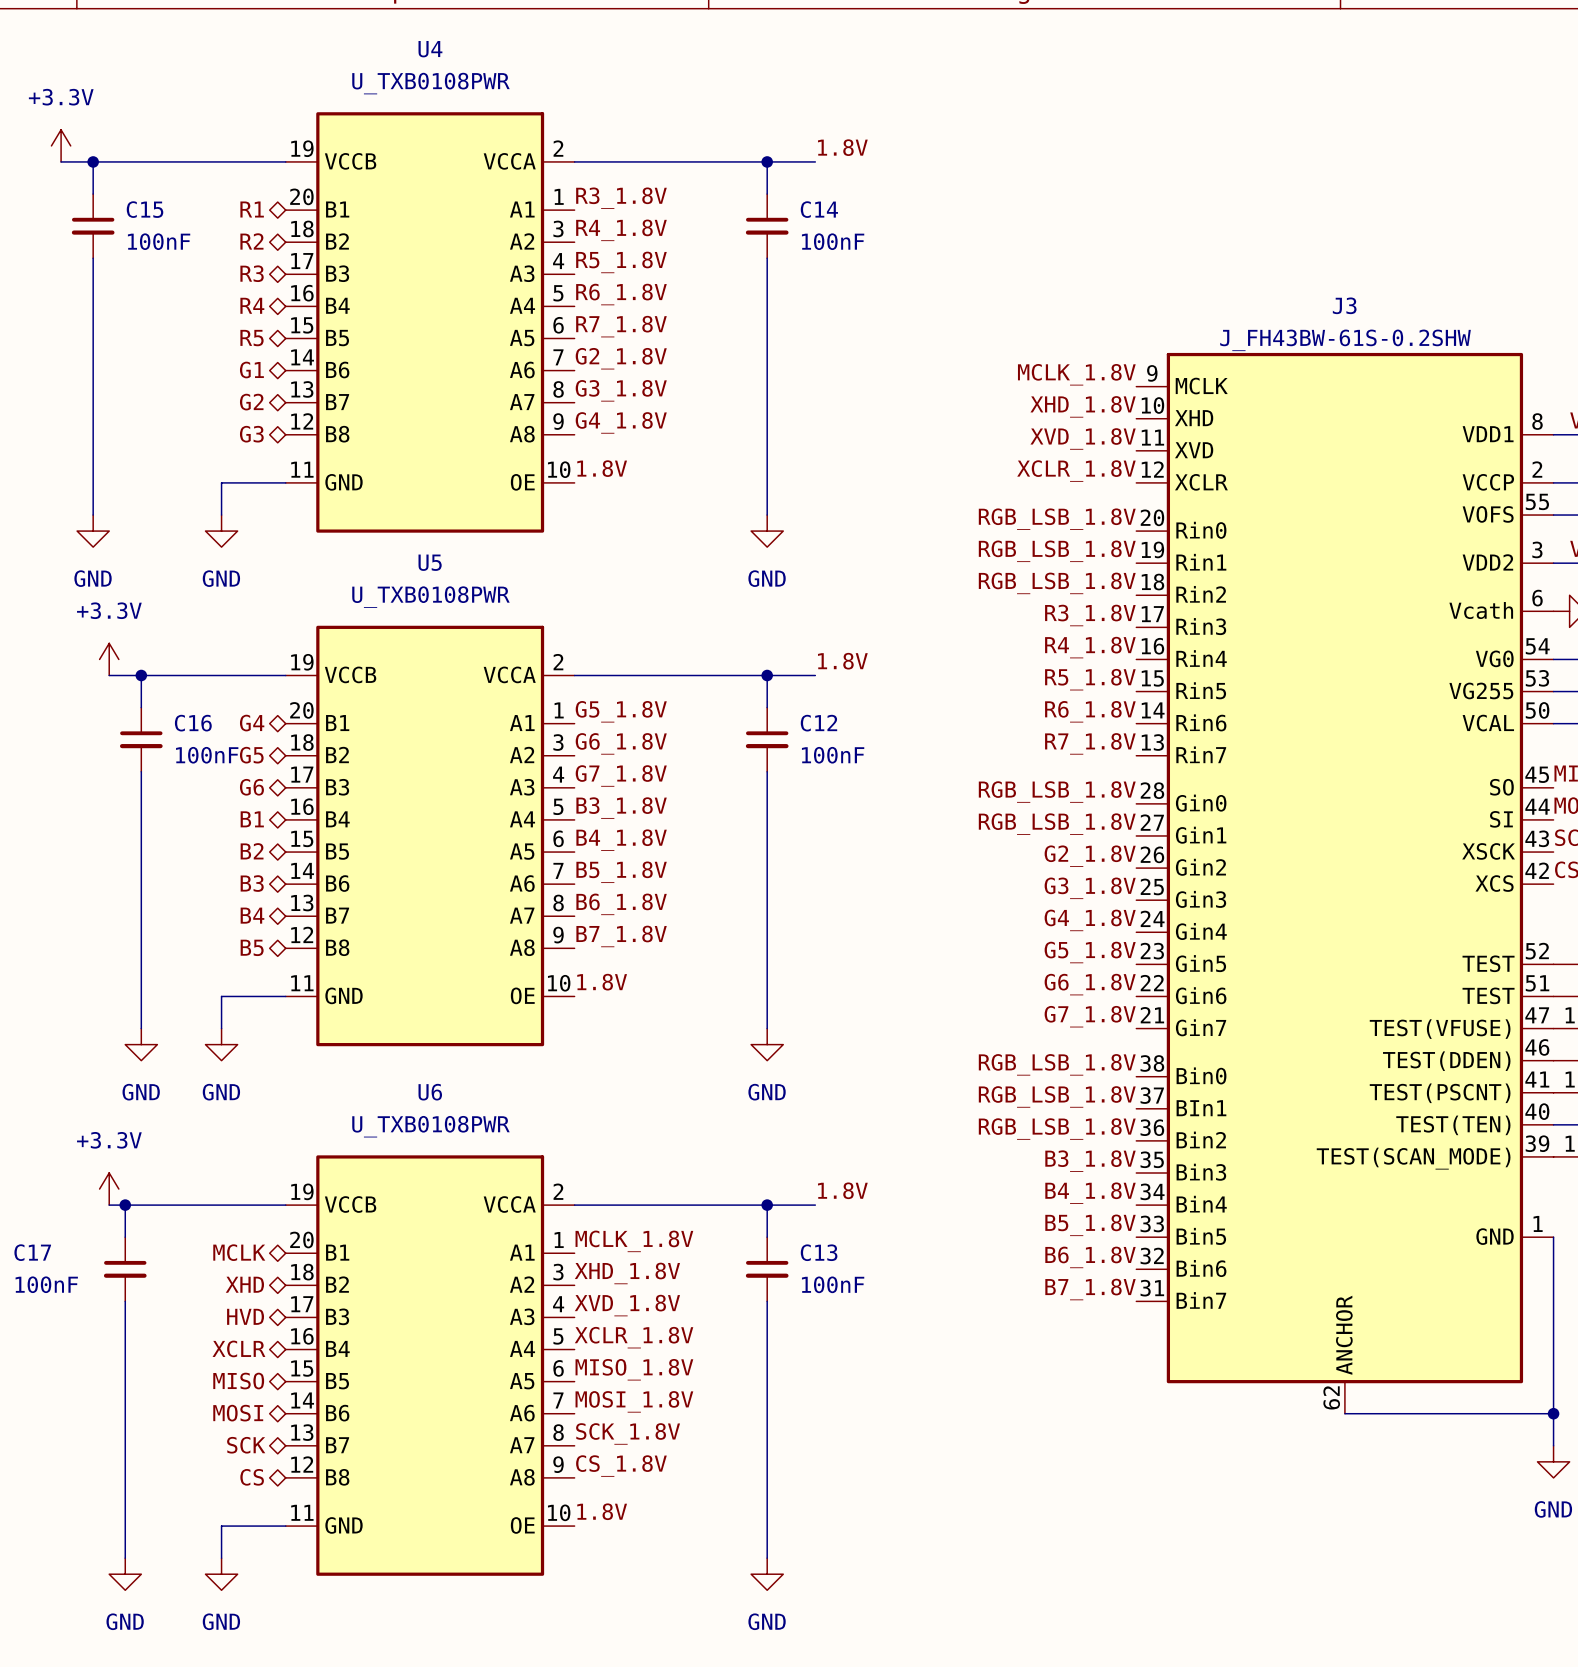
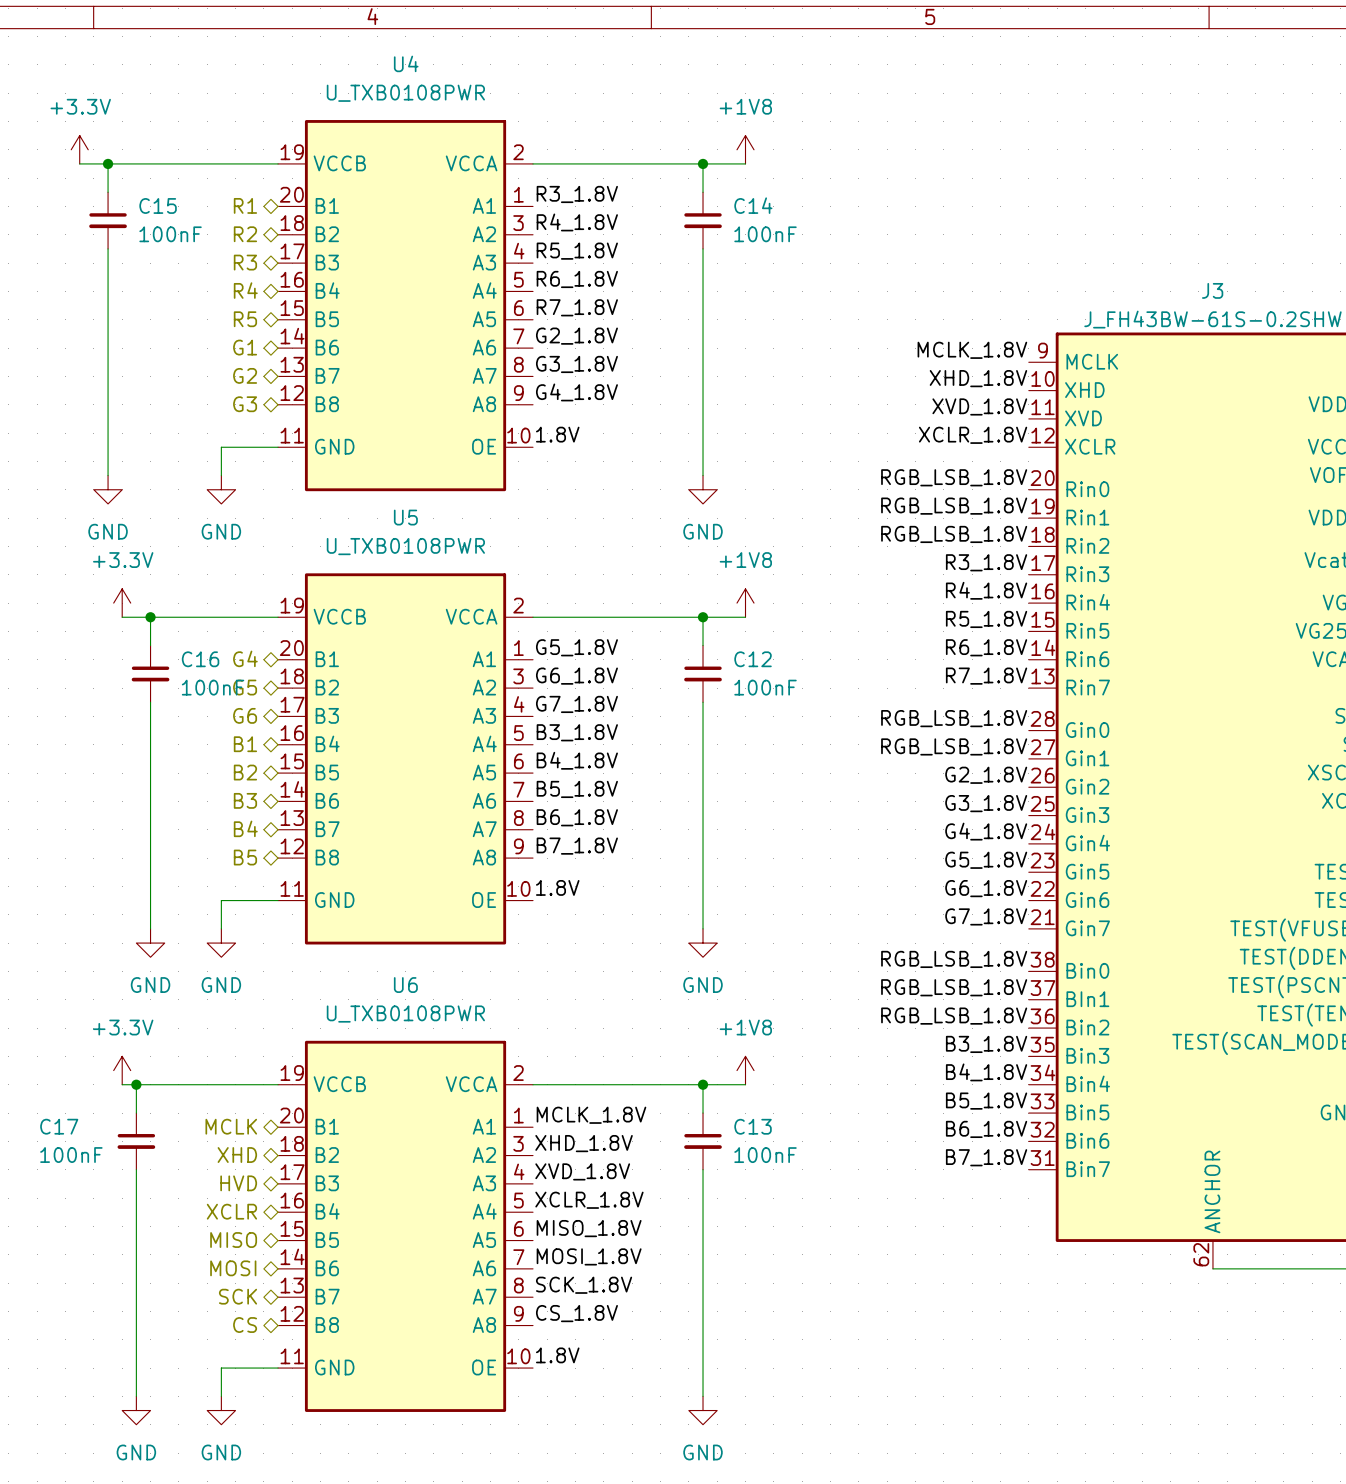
power symbol: none -> +1V8 (745, 149)
label: 1.8V (842, 147) -> none
power symbol: none -> +1V8 (745, 603)
label: 1.8V (842, 661) -> none
power symbol: none -> +1V8 (745, 1070)
label: 1.8V (842, 1190) -> none

